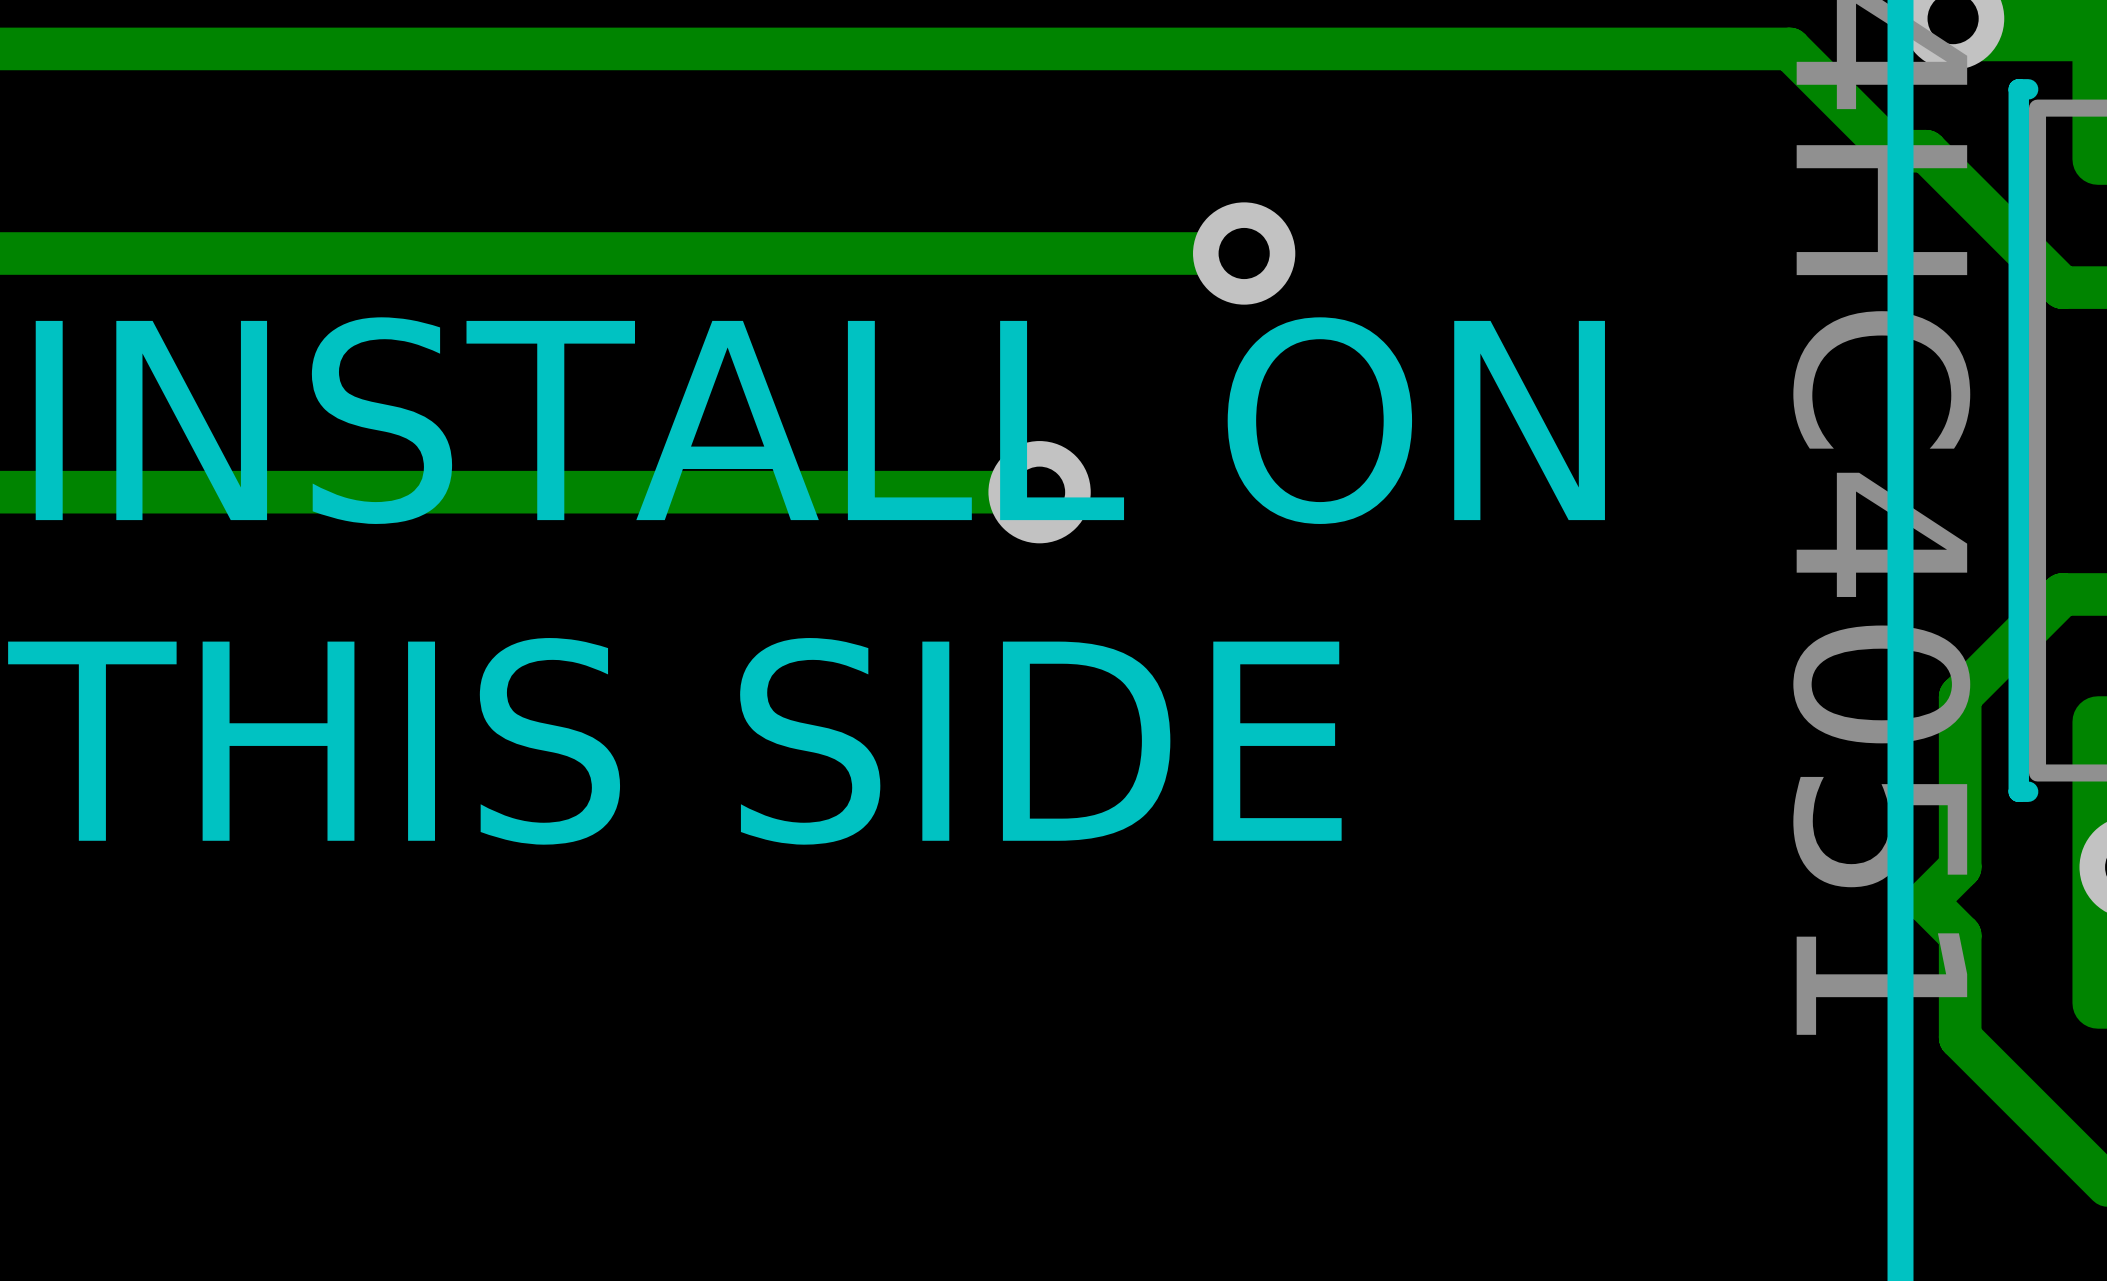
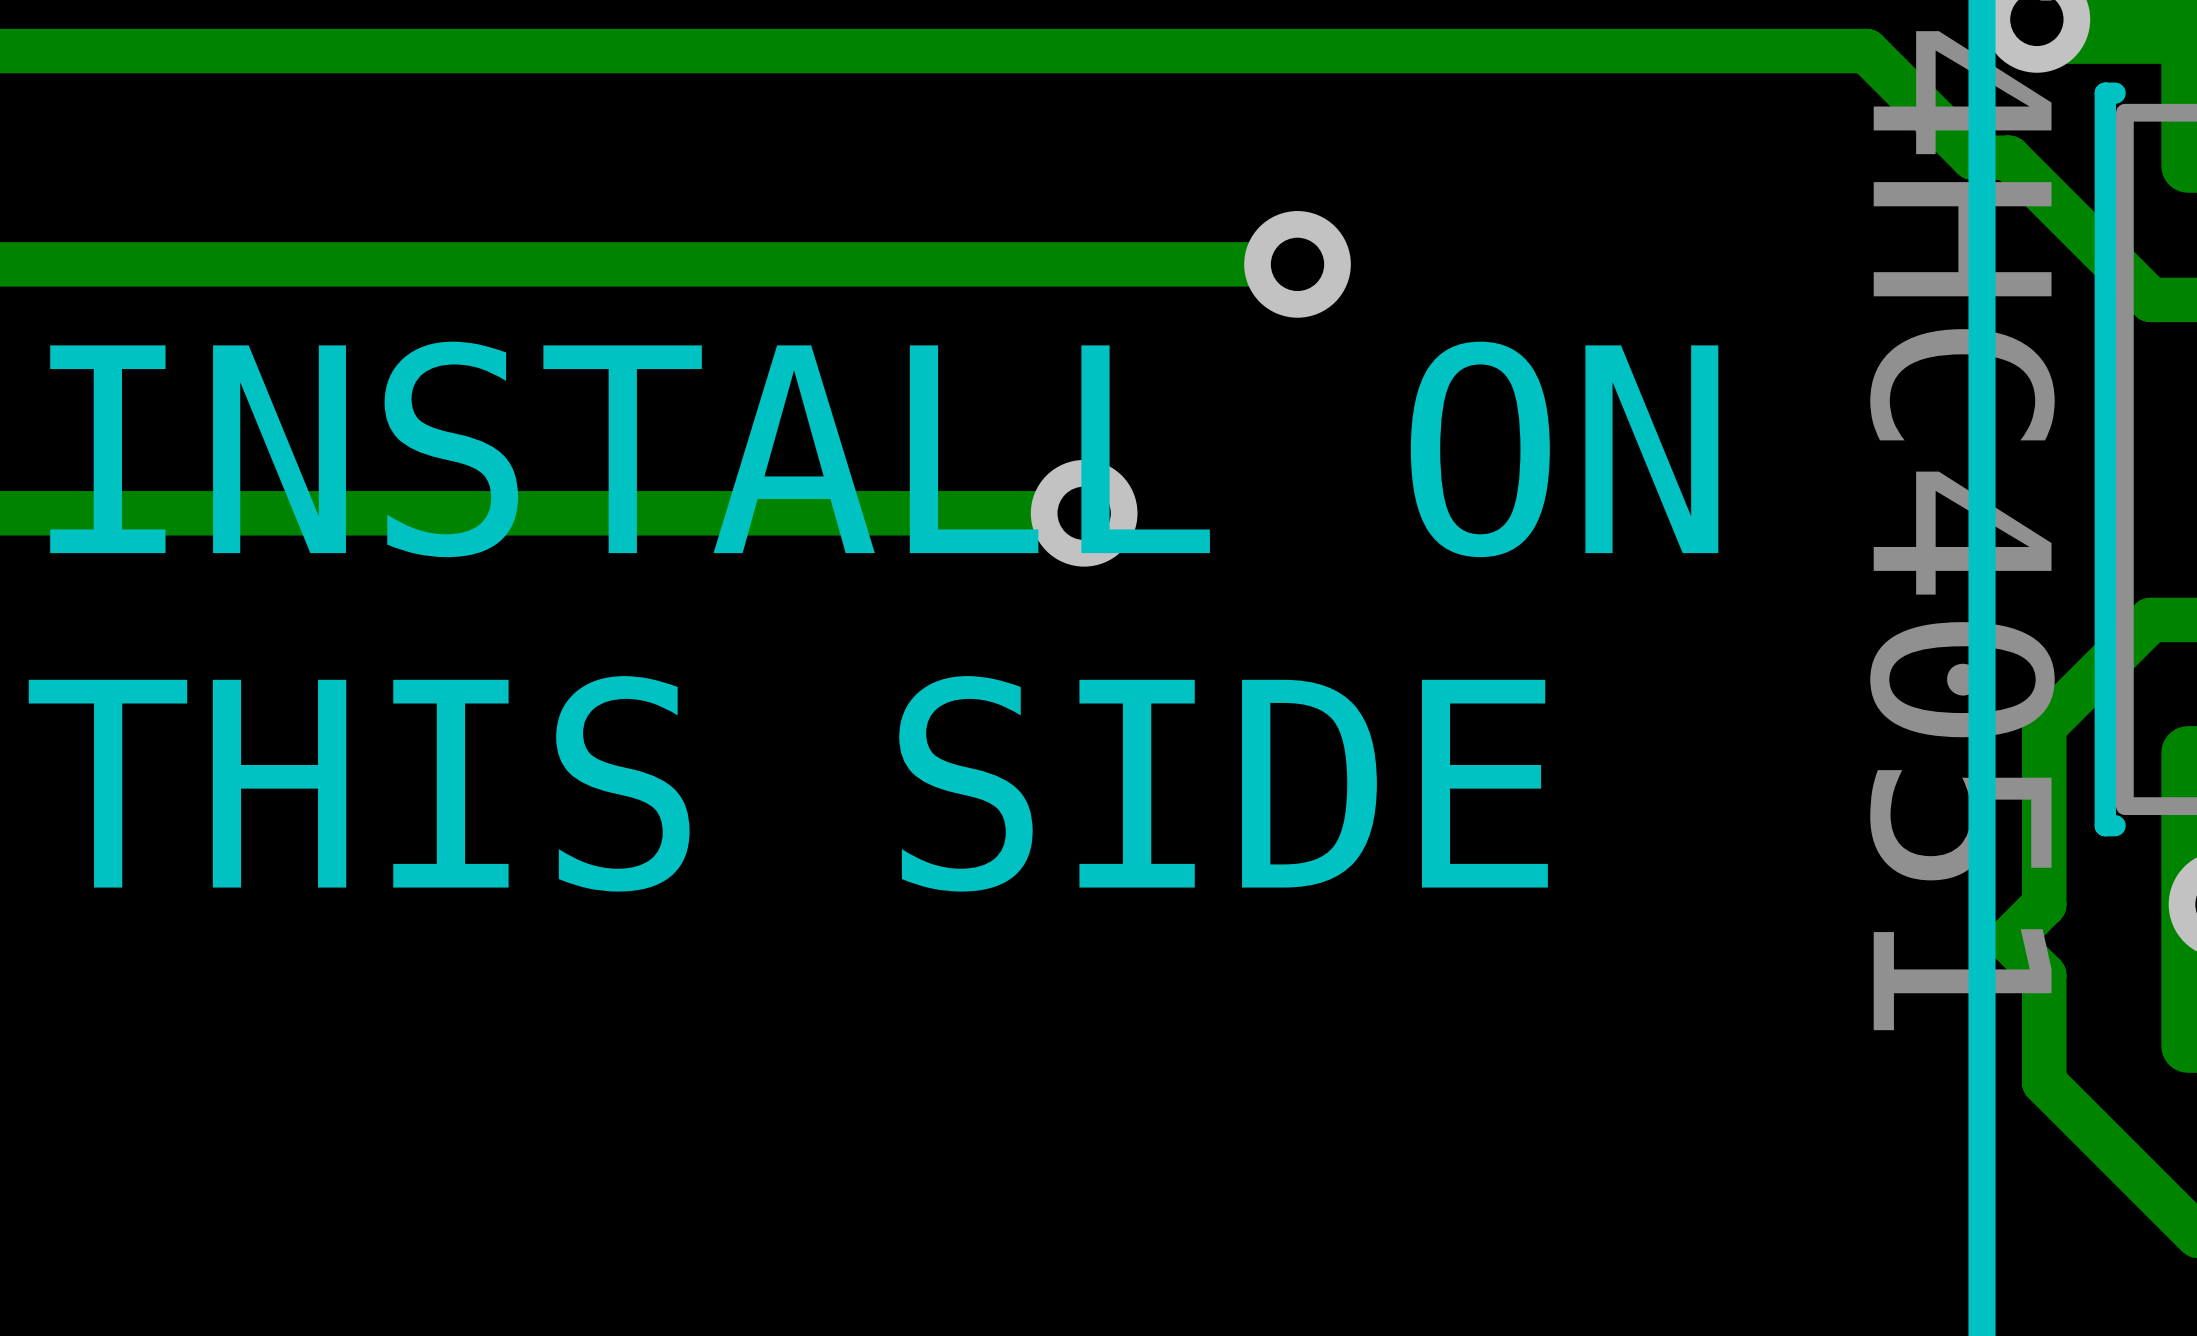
part text position: INSTALL ON (820, 420) -> INSTALL ON (884, 449)
part text position: THIS SIDE (674, 741) -> THIS SIDE (788, 783)

